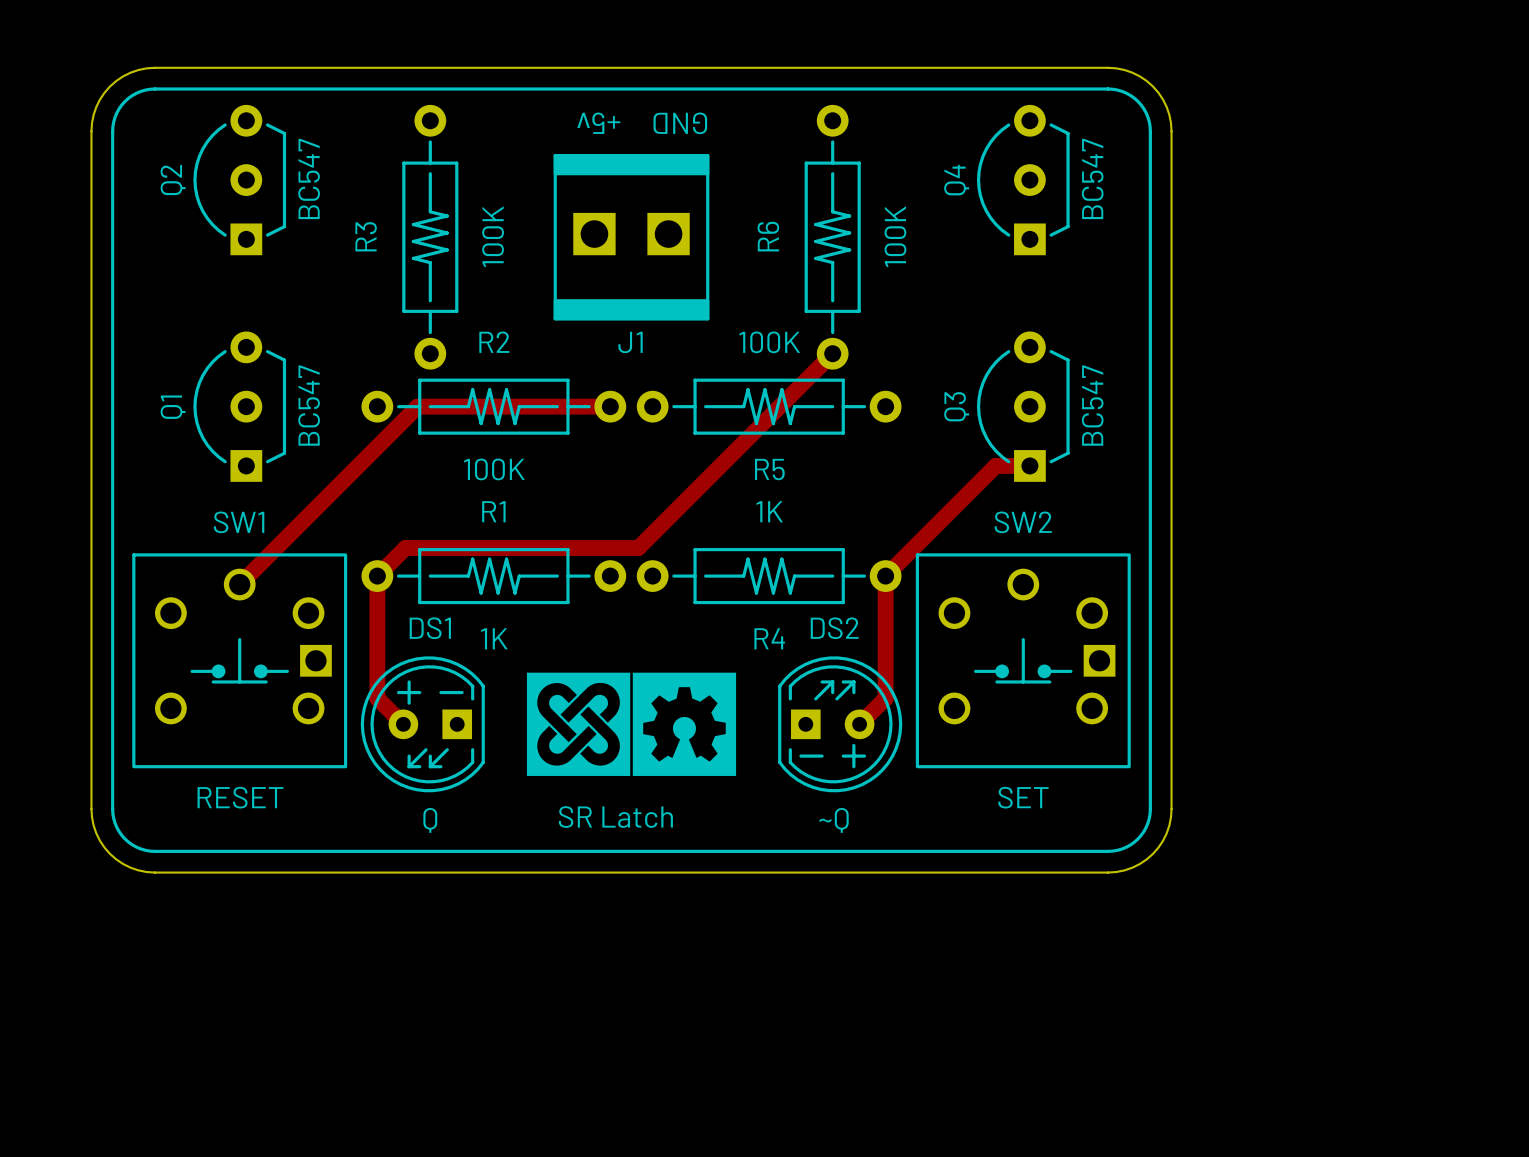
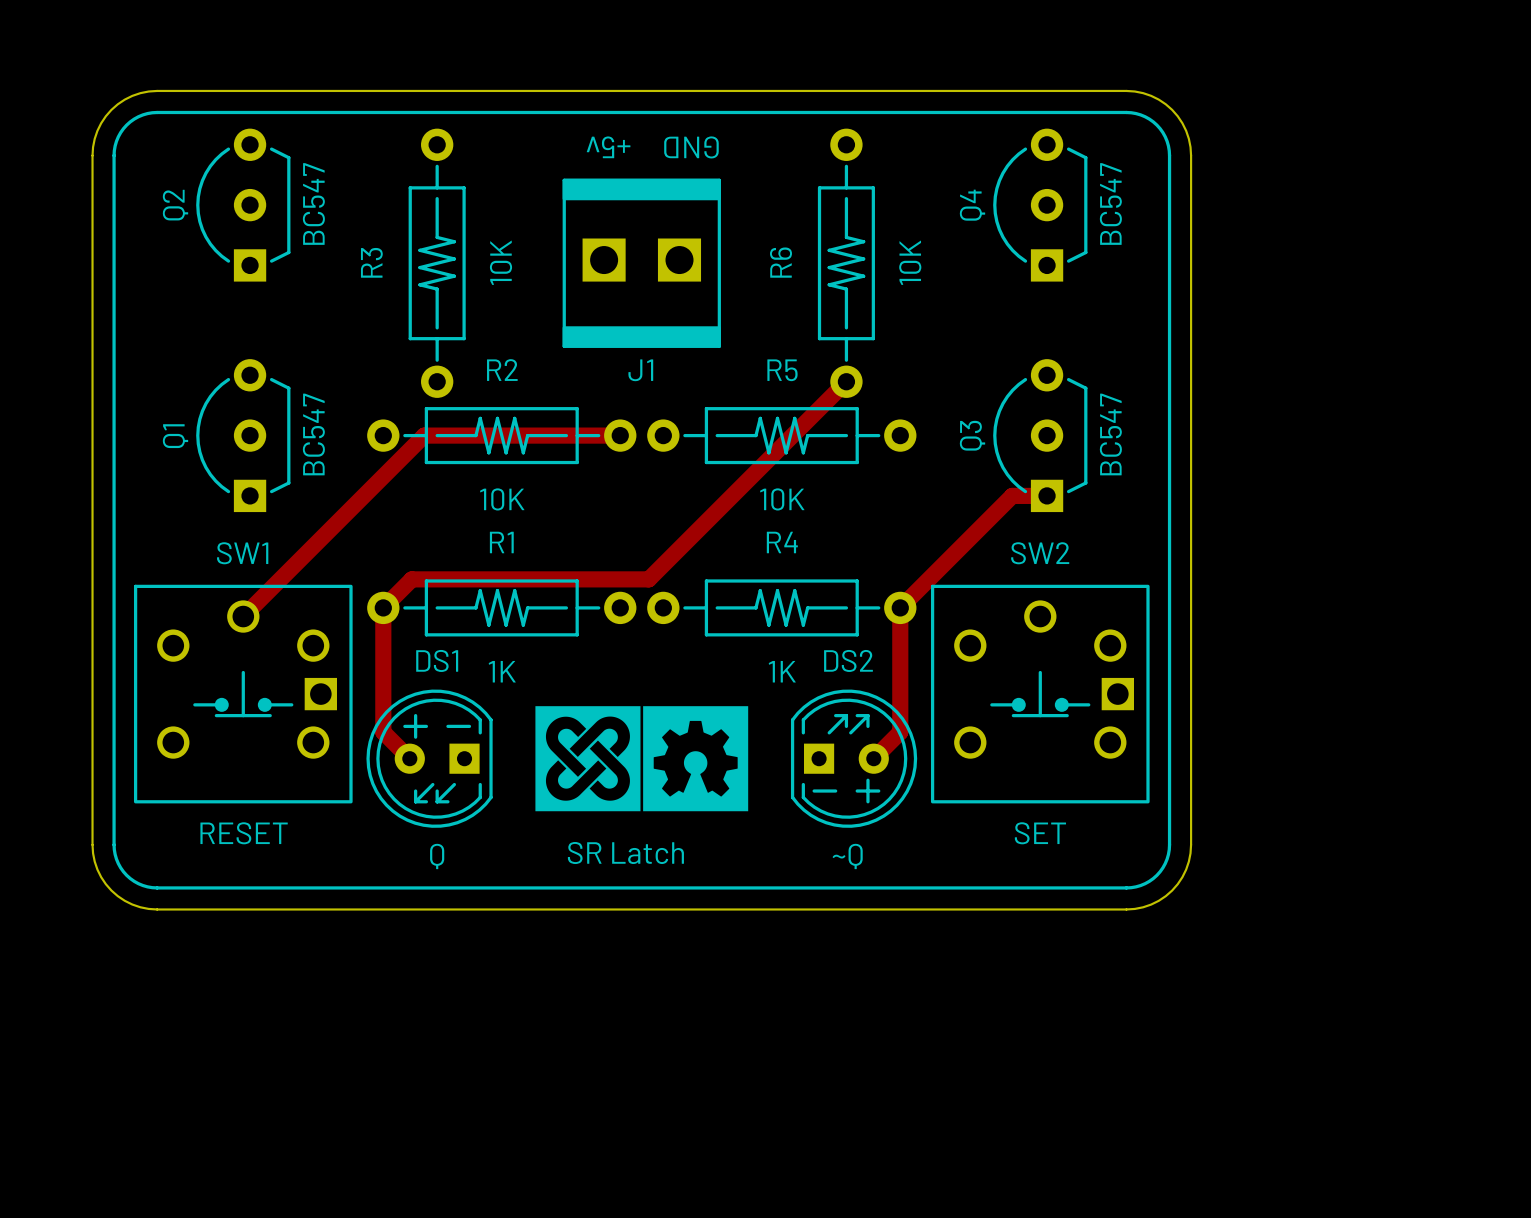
R3 value: 100K (493, 236) -> 10K (500, 262)
R6 value: 100K (895, 236) -> 10K (910, 262)
R5 value: 100K (769, 342) -> 10K (782, 499)
R2 value: 100K (494, 469) -> 10K (502, 499)
R5 name position: R5 (769, 469) -> R5 (782, 370)
R4 value position: 1K (769, 511) -> 1K (782, 671)
R4 name position: R4 (769, 638) -> R4 (782, 542)

